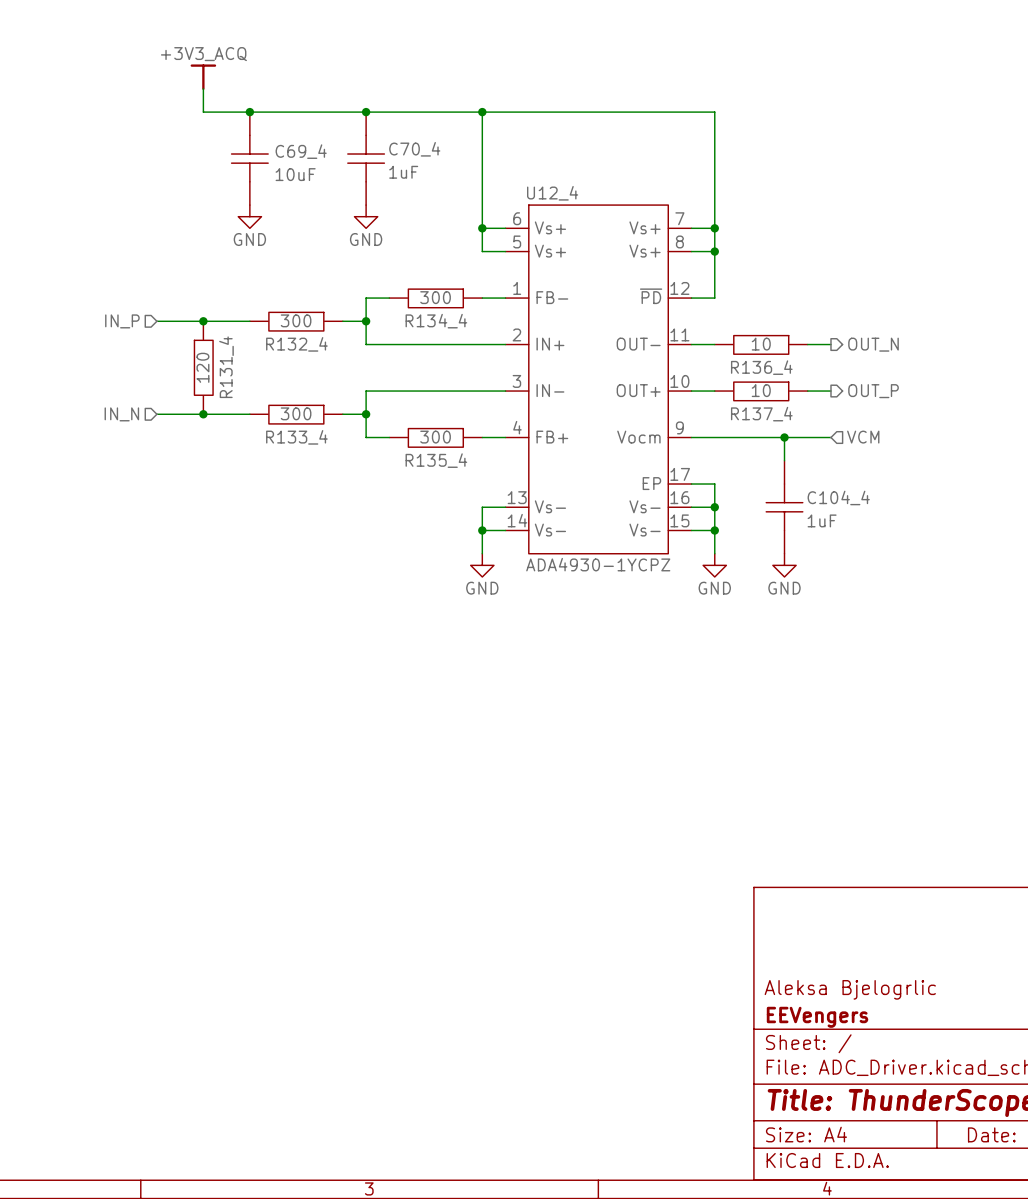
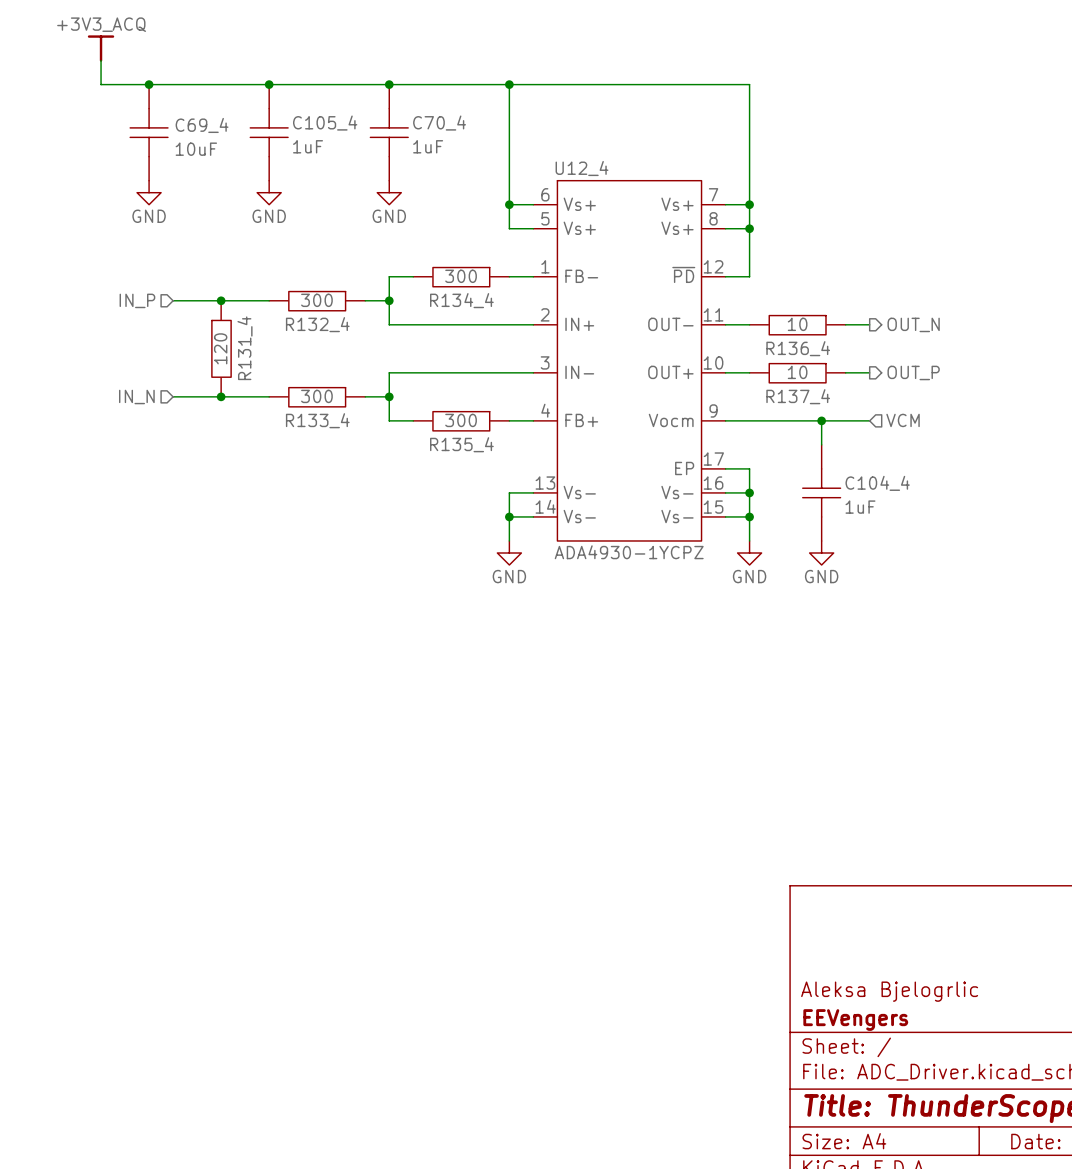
power symbol position: +3V3_ACQ (203, 77) -> +3V3_ACQ (101, 48)
wire: (203, 88) (203, 112) -> (101, 60) (101, 84) (221, 84)
junction: none -> (149, 84)
C69_4 name: C69_4 (301, 151) -> C105_4 (325, 123)
C69_4: none -> 10uF (149, 132)
C69_4 value: 10uF (295, 174) -> 1uF (308, 146)
power symbol: none -> GND (149, 192)

